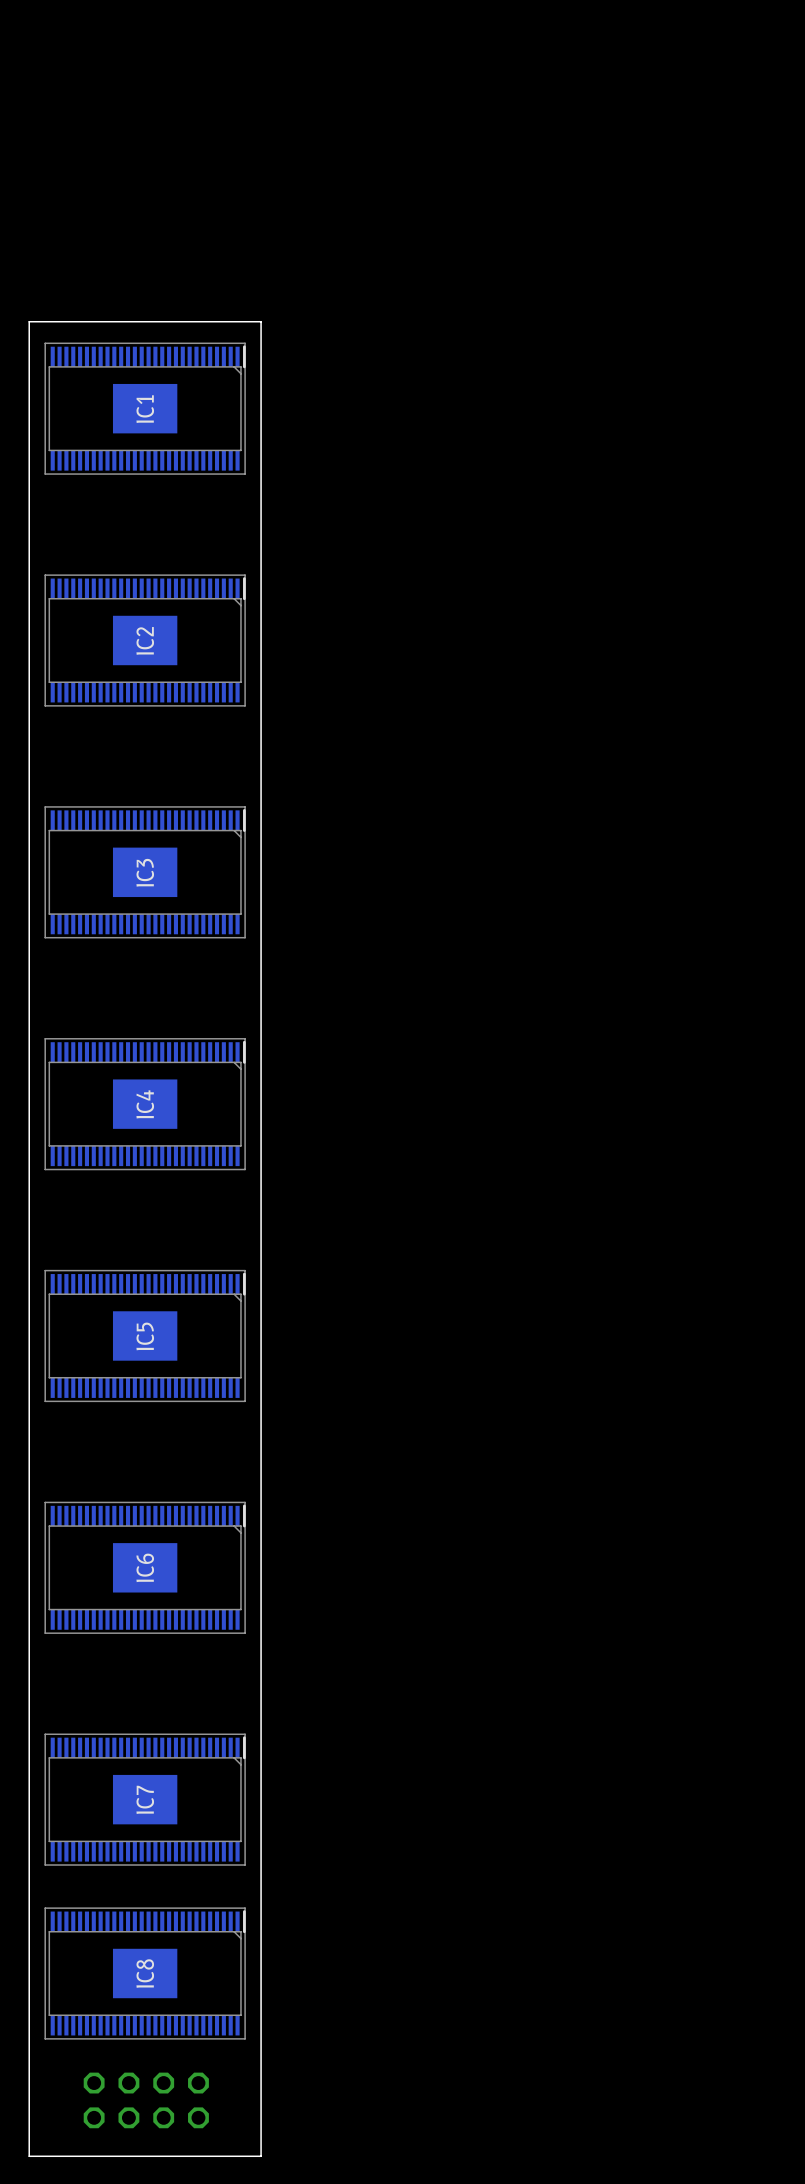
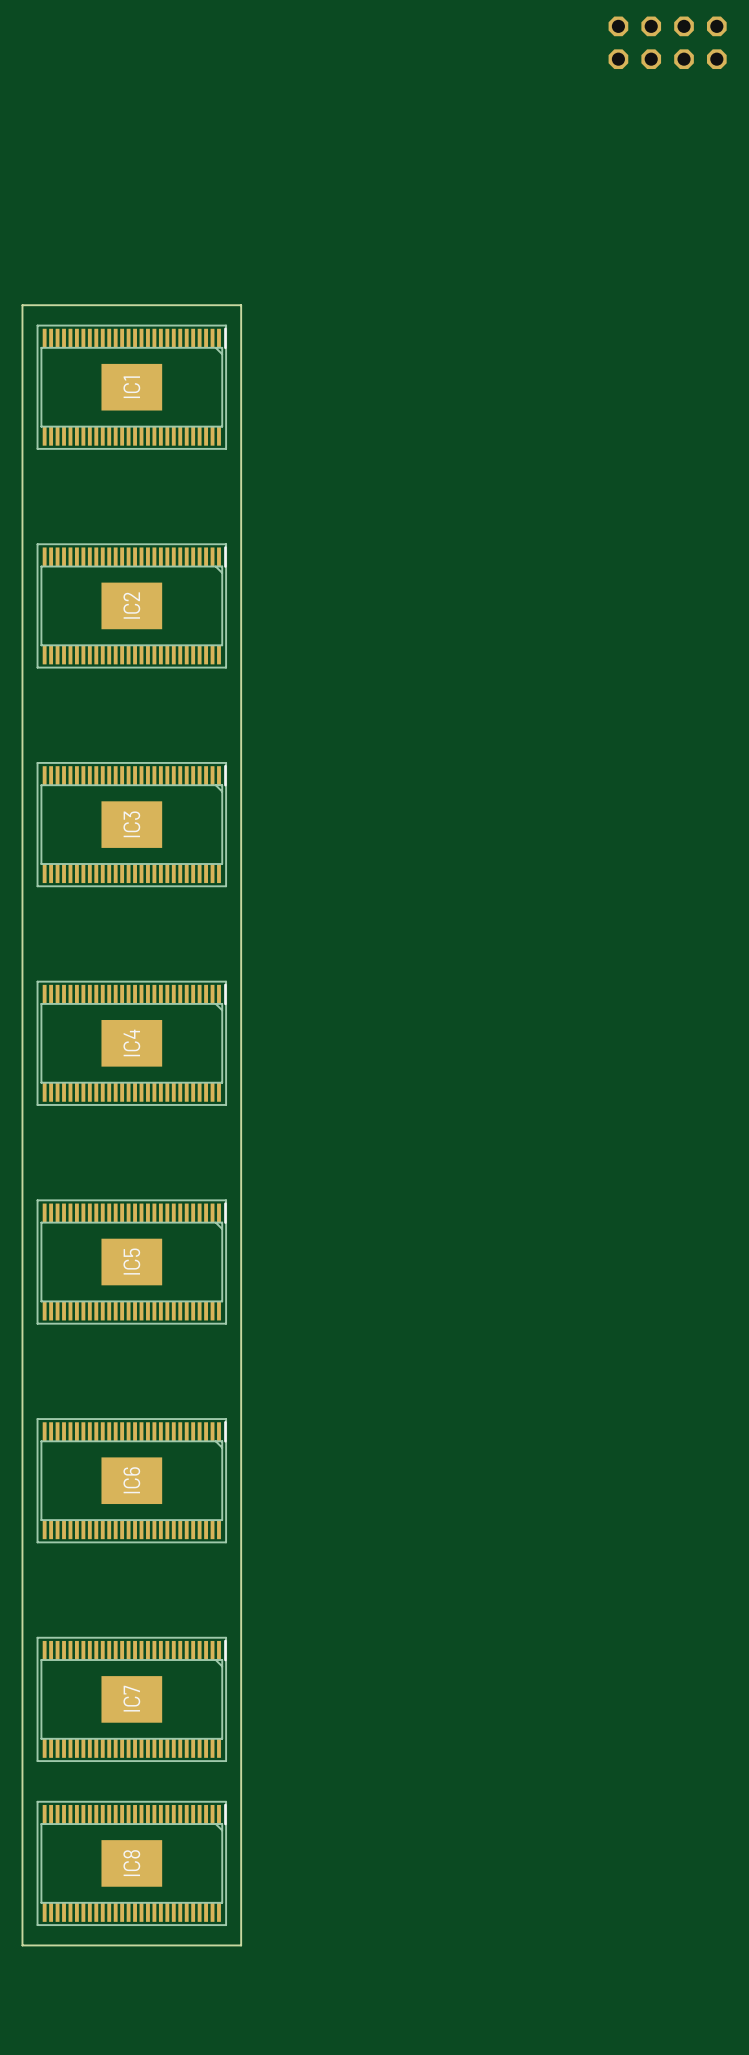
part: none -> (667, 42)
board edge: (261, 2060) (261, 2156) (29, 2156) (29, 2060) -> (241, 1945) (22, 1945)
part: (146, 2100) -> none

